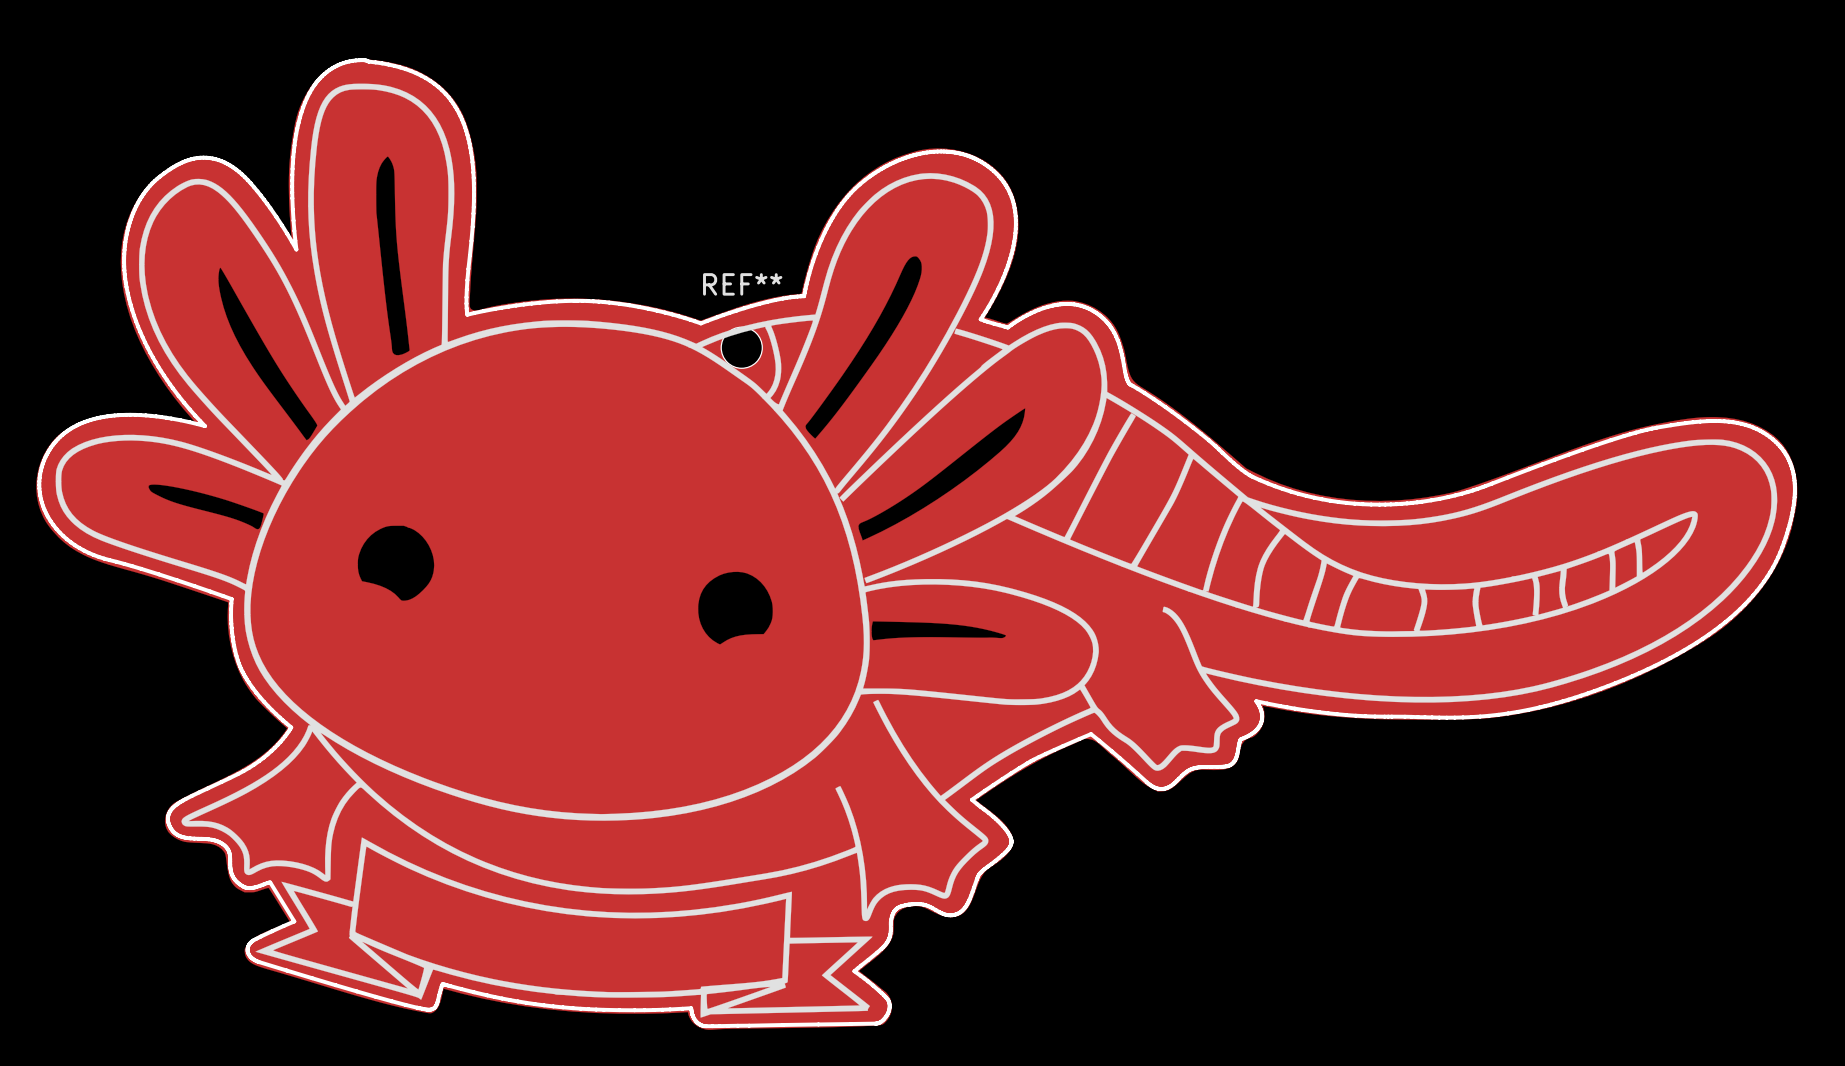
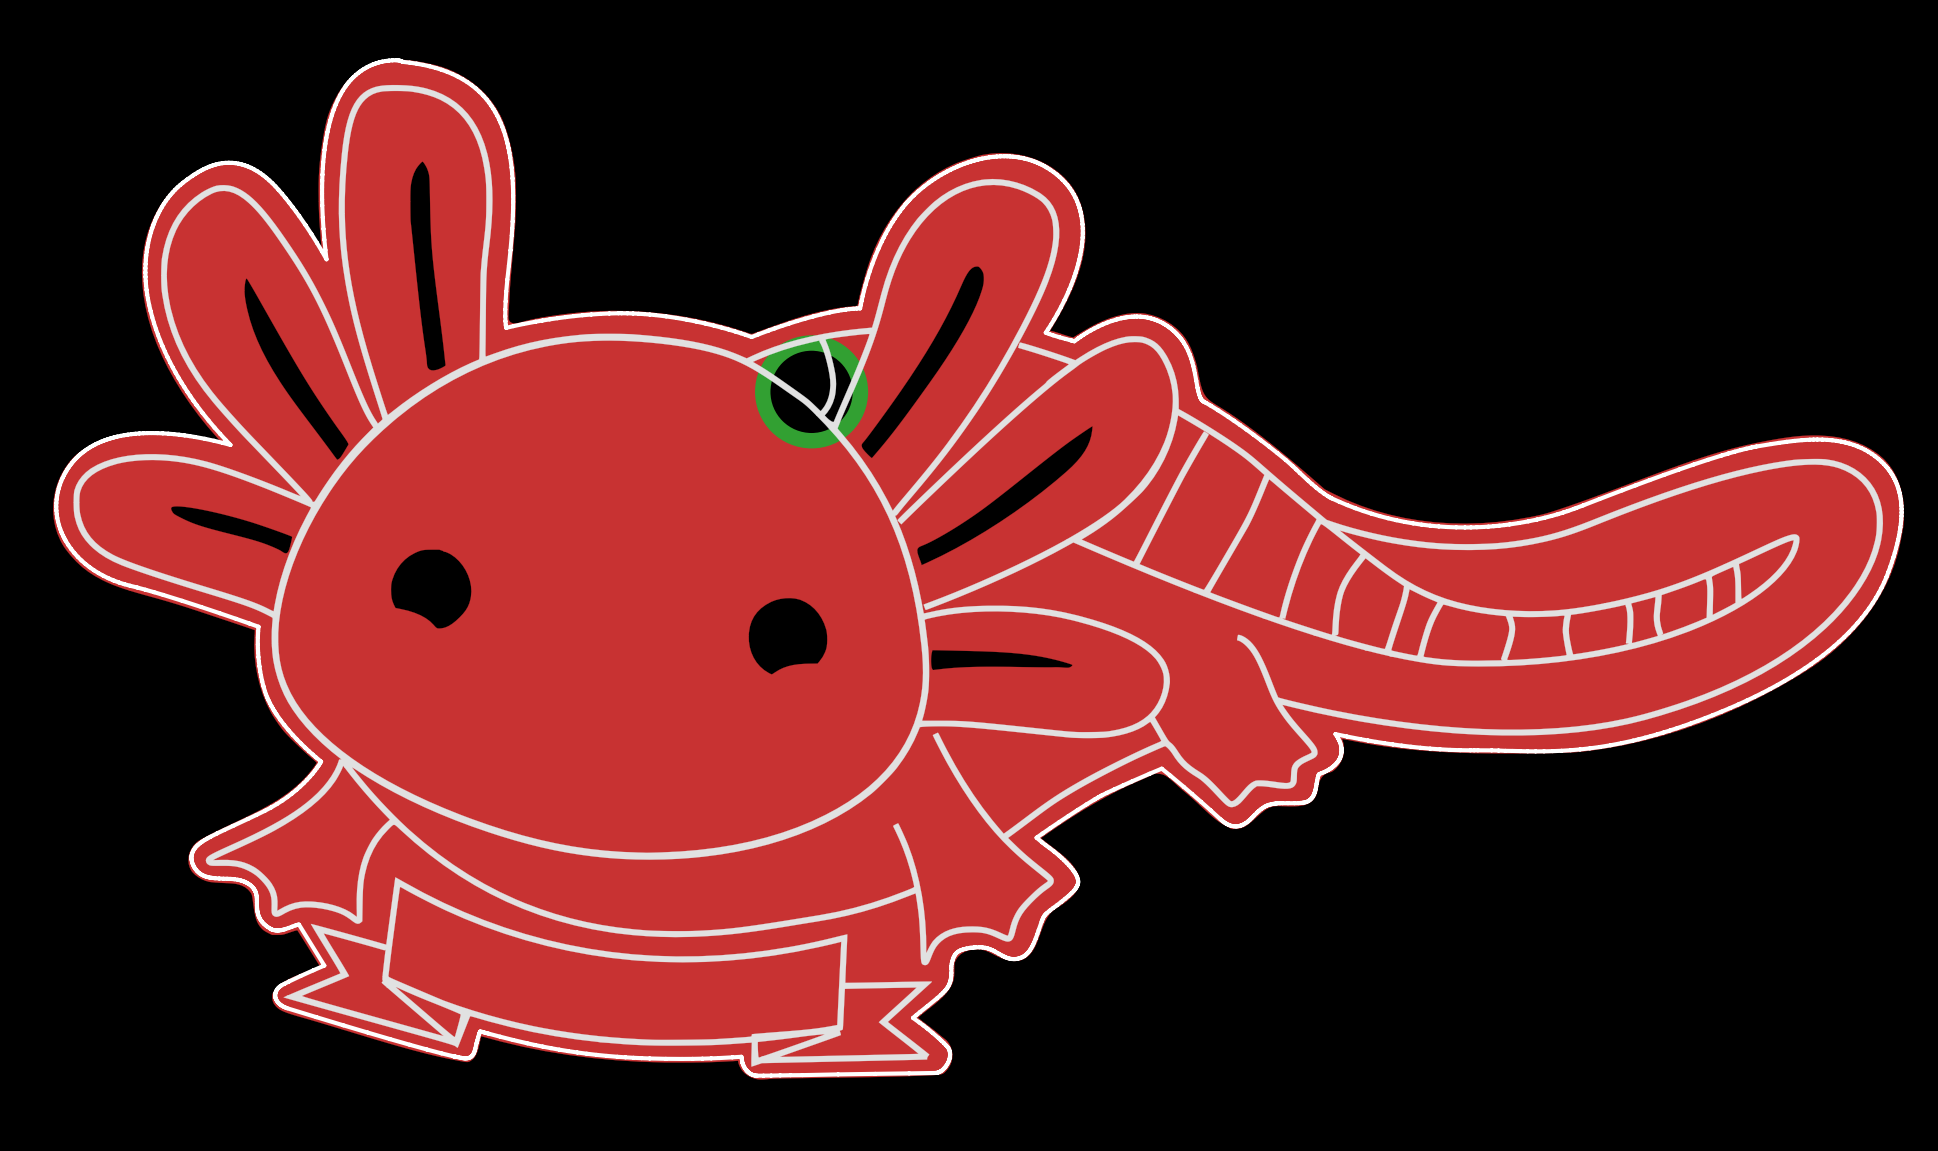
REF**: (741, 347) -> none
part: none -> (811, 391)

